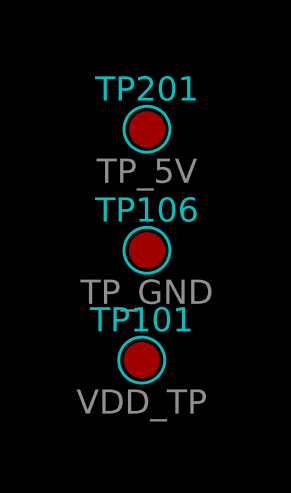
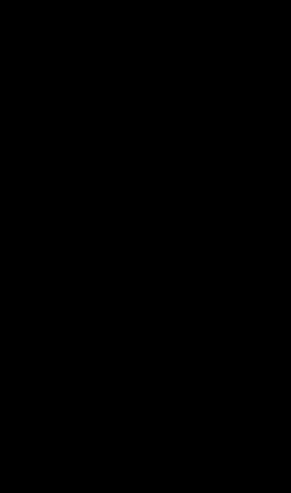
TP201: TP_5V (146, 129) -> none
TP106: TP_GND (146, 250) -> none
TP101: VDD_TP (141, 360) -> none

